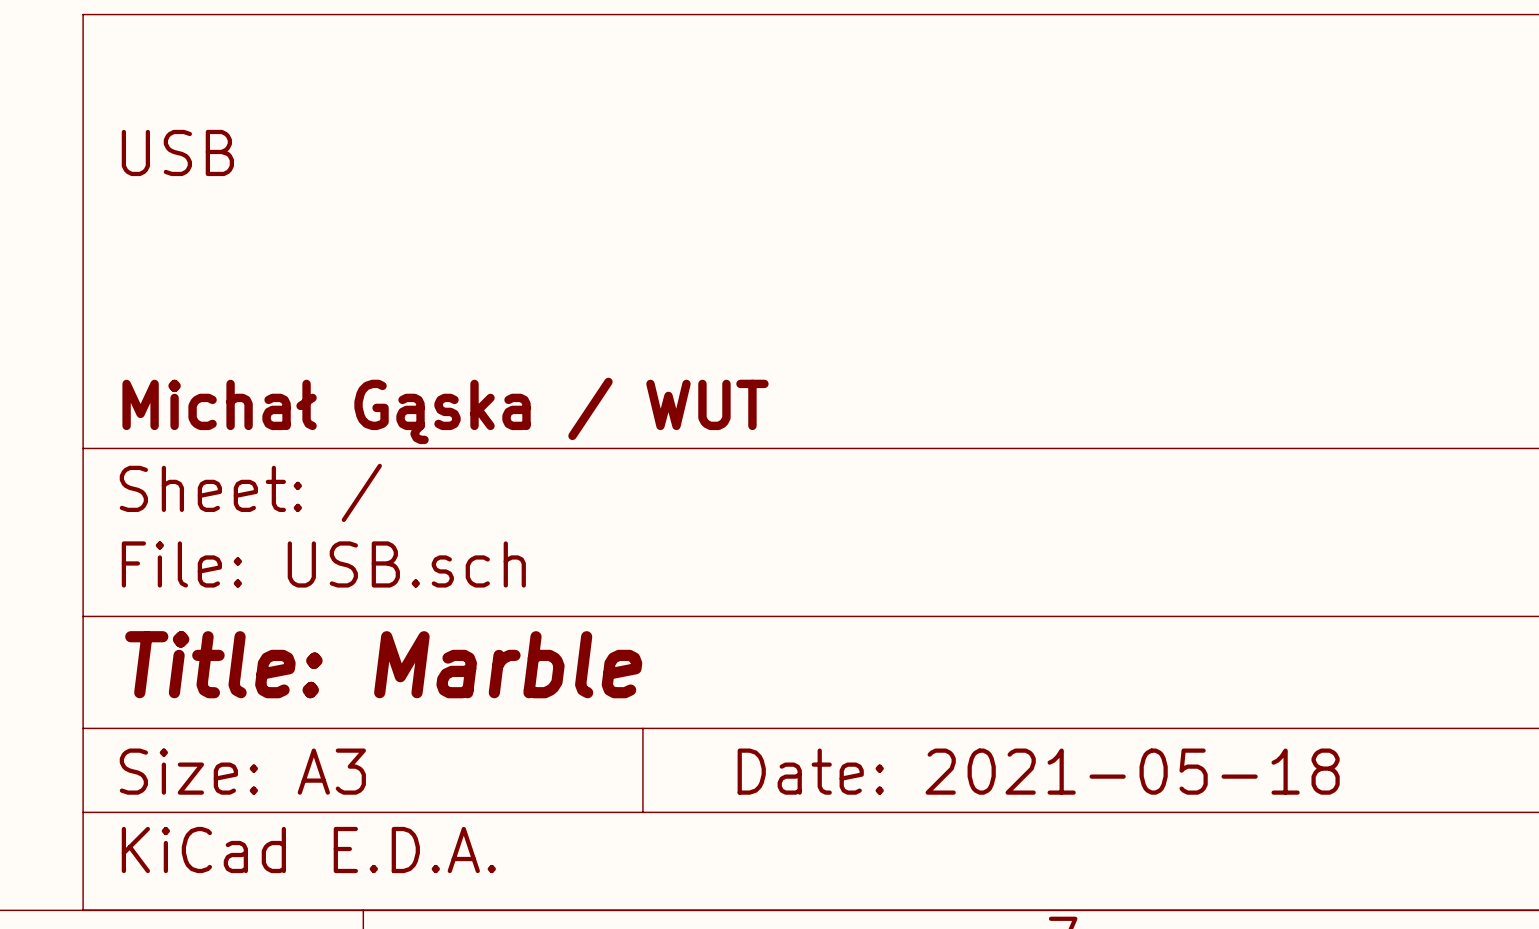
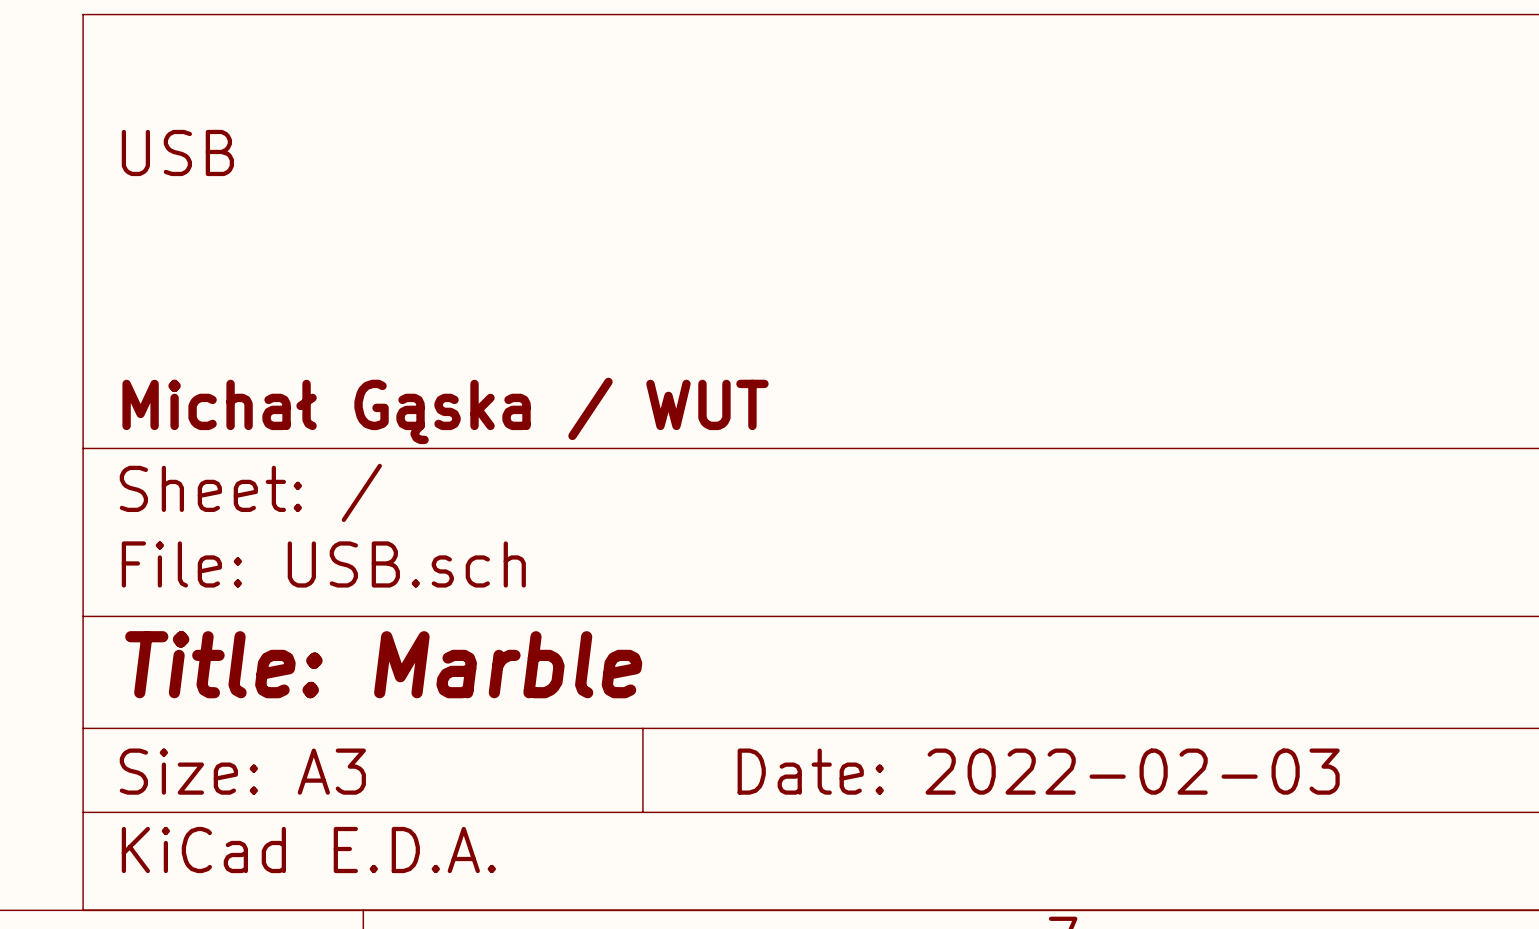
title block: Date: 2021-05-18 (1038, 771) -> Date: 2022-02-03 (1038, 771)

